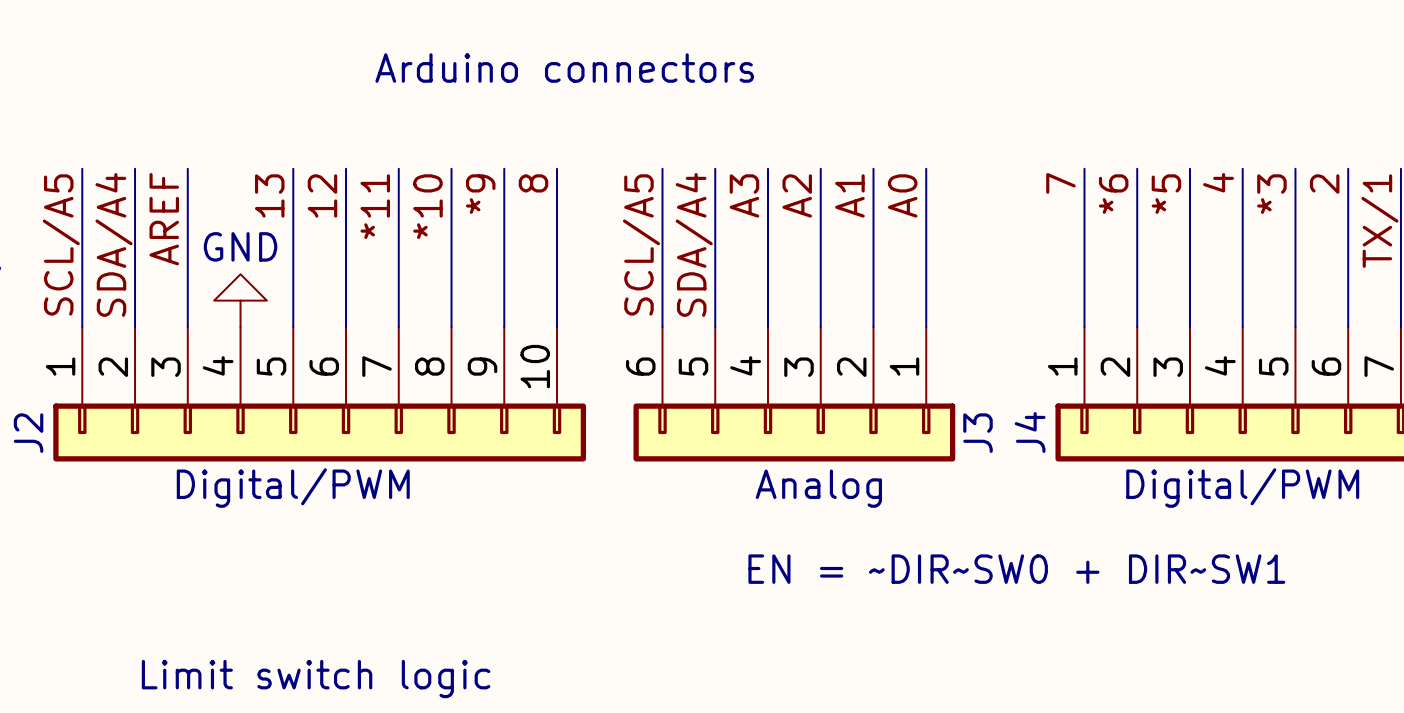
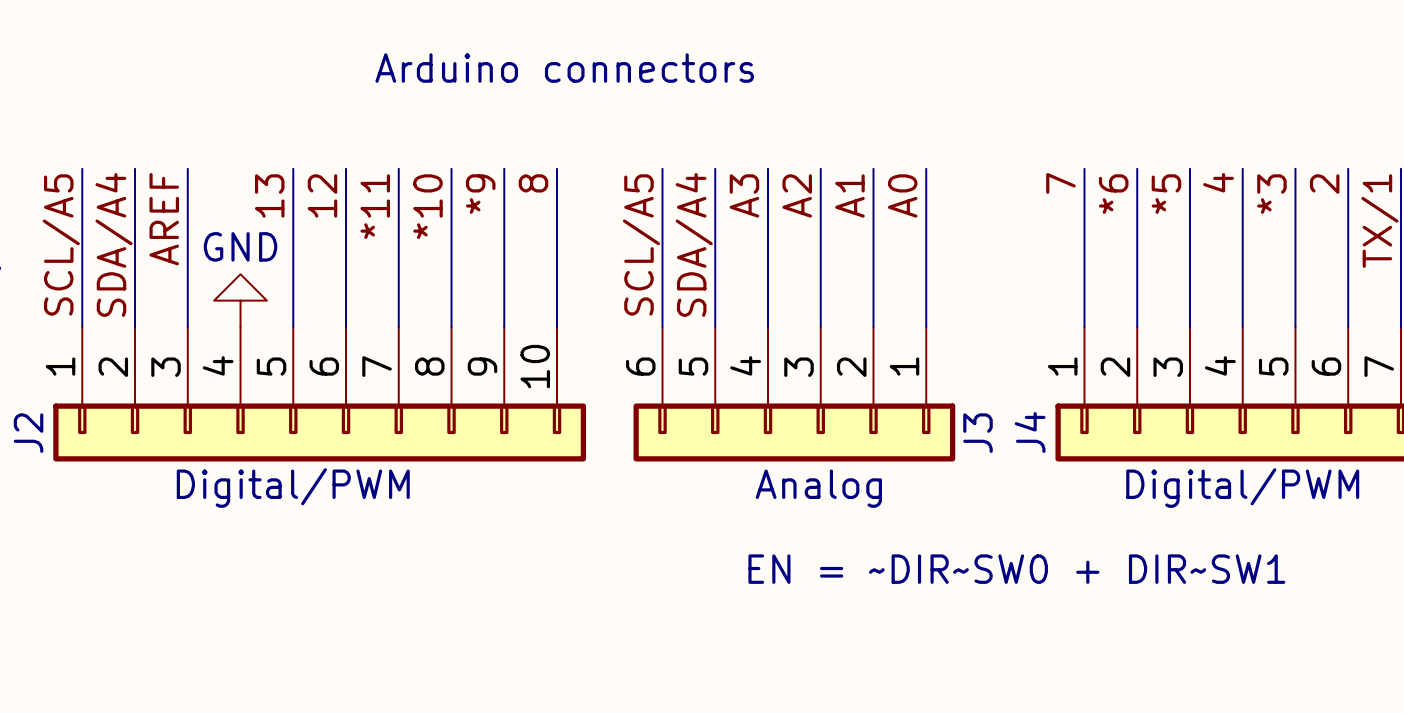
text: Limit switch logic (316, 679) -> none

